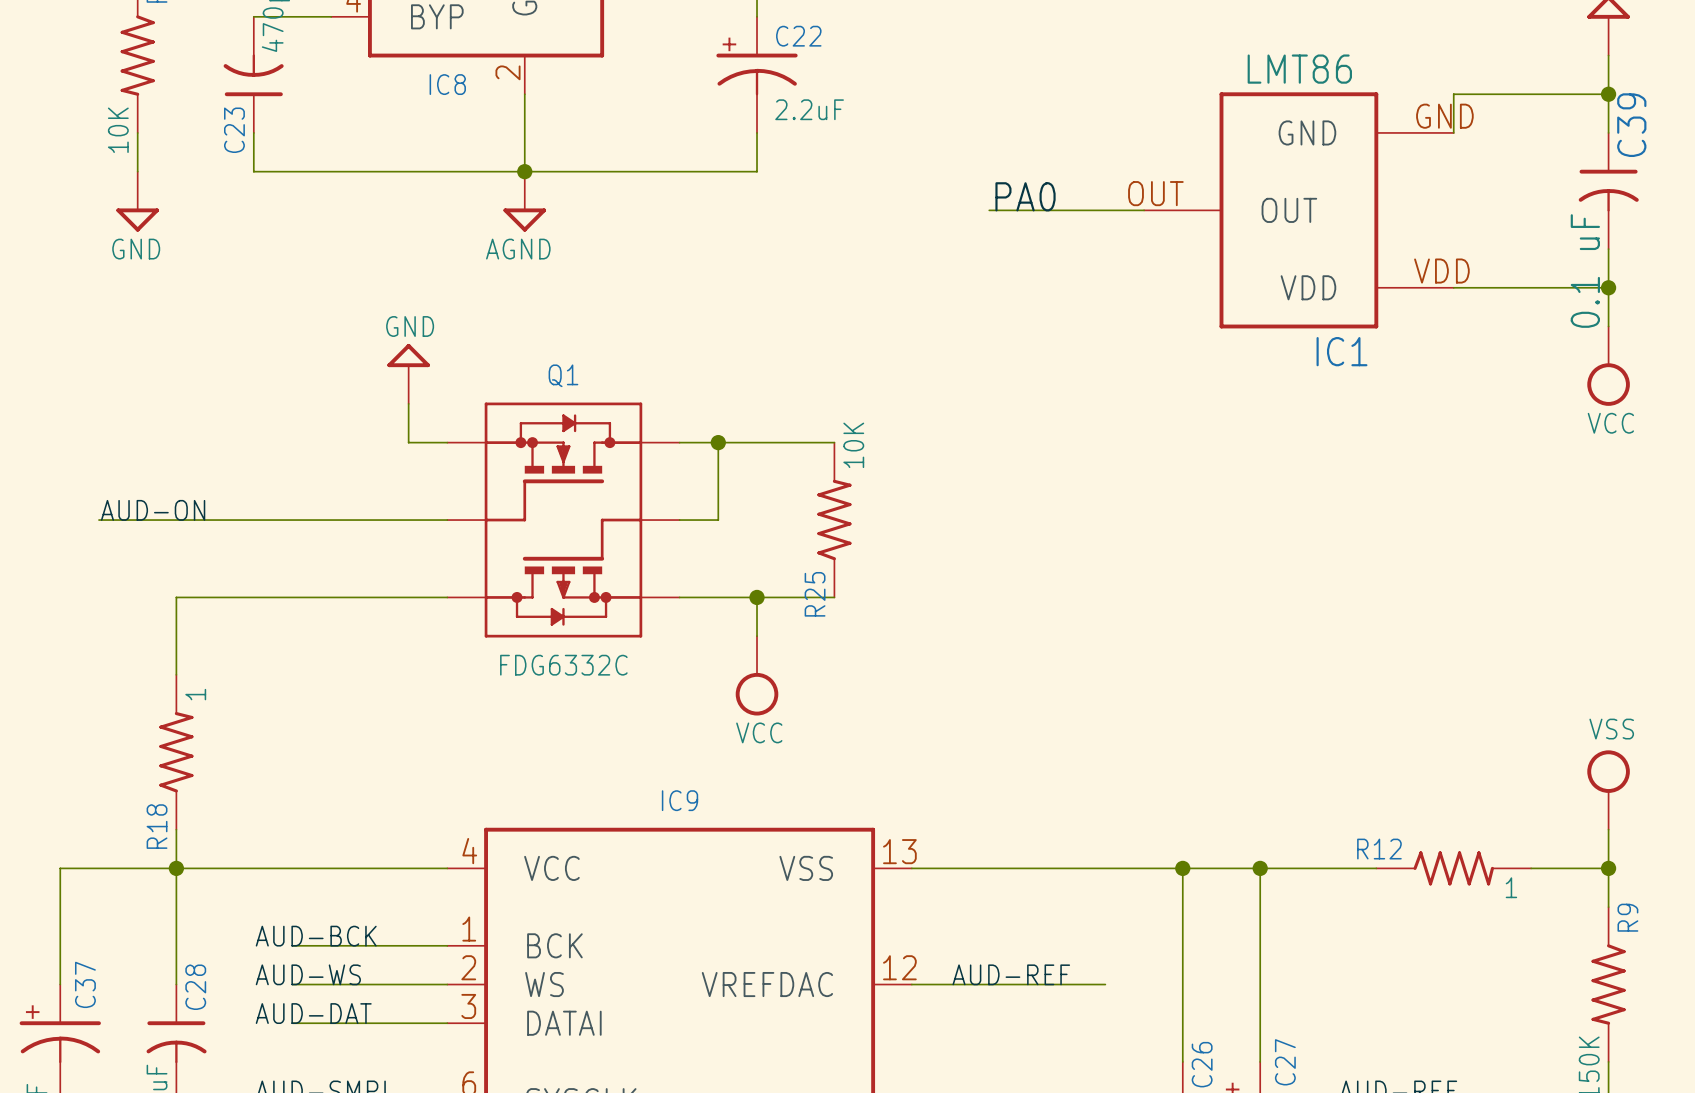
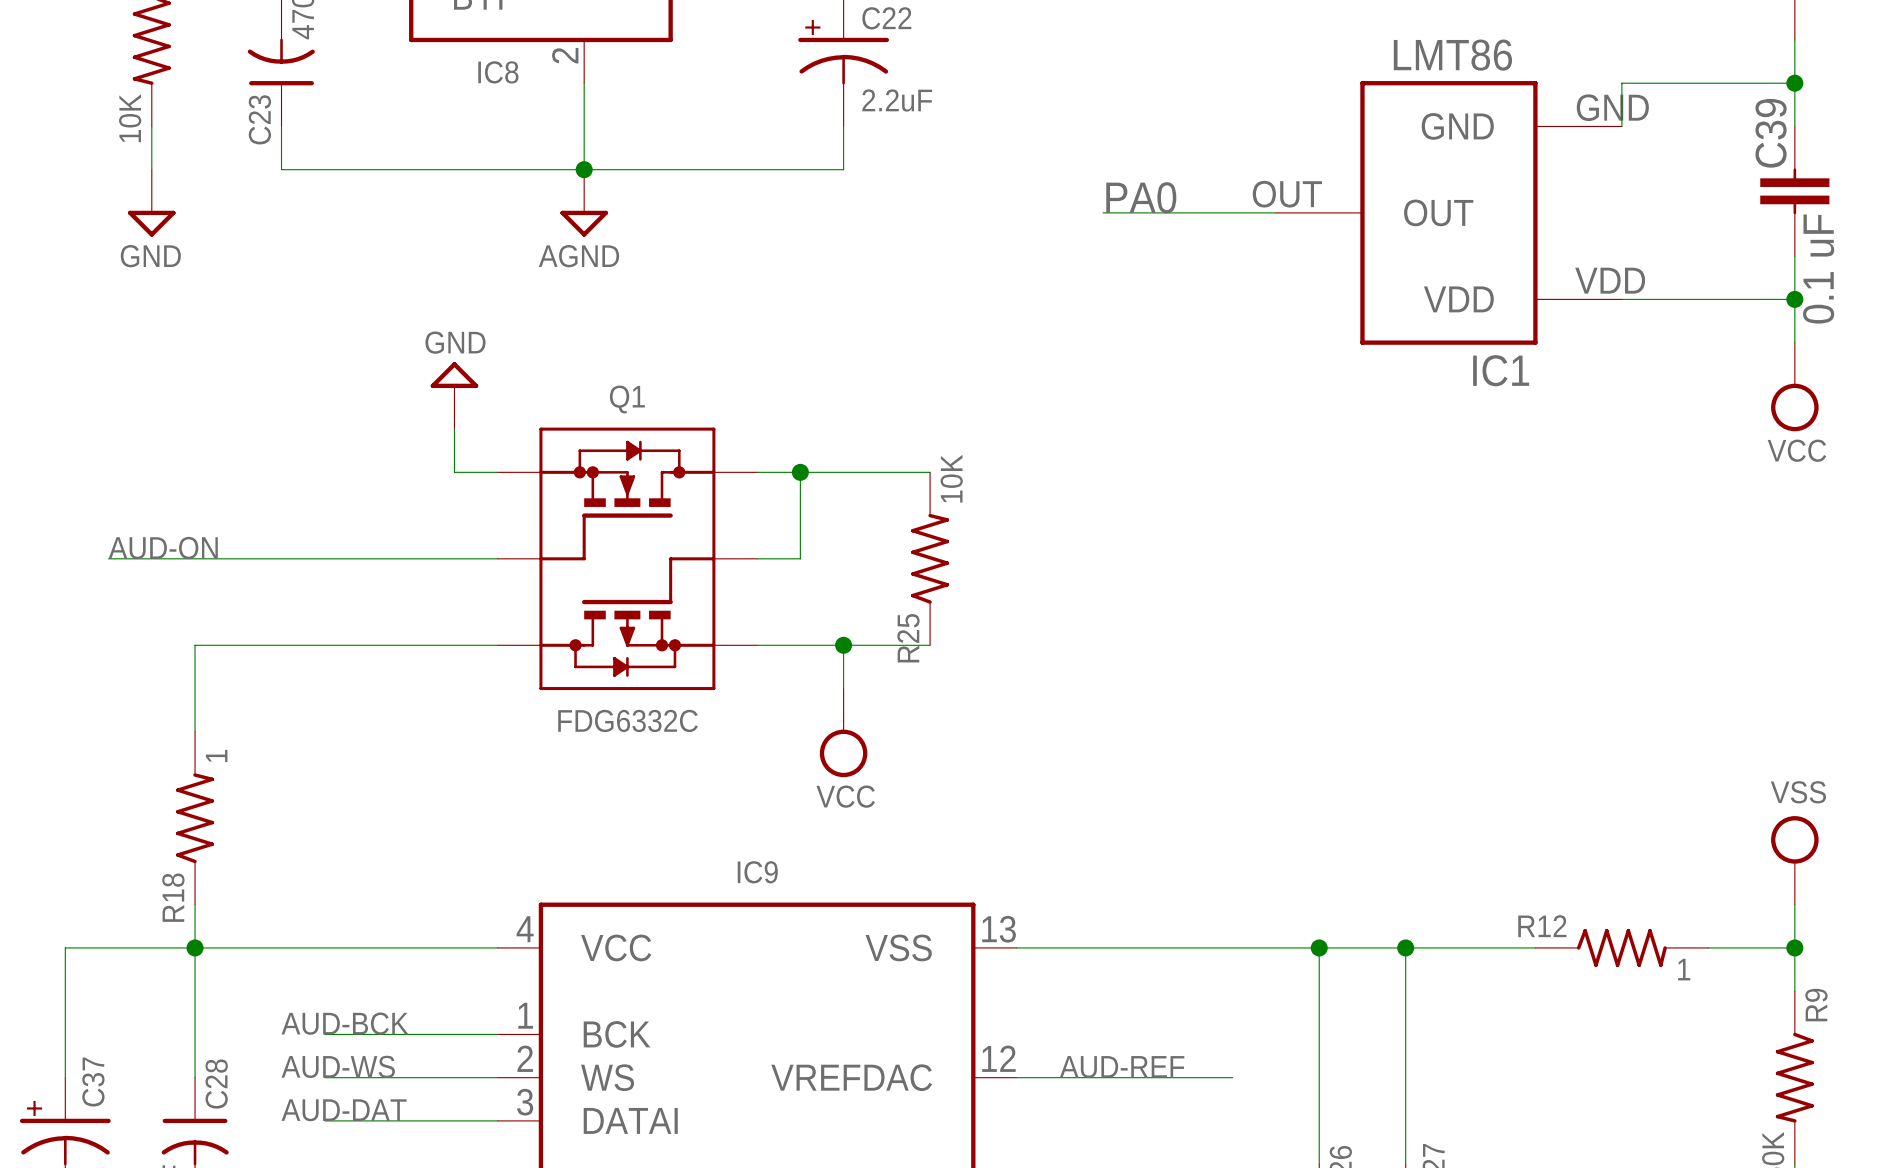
C39 name position: C39 (1631, 125) -> C39 (1771, 133)
C39 symbol: [1578, 132, 1639, 250] -> [1760, 126, 1830, 257]
C39 value position: 0.1 uF (1585, 271) -> 0.1 uF (1818, 269)

